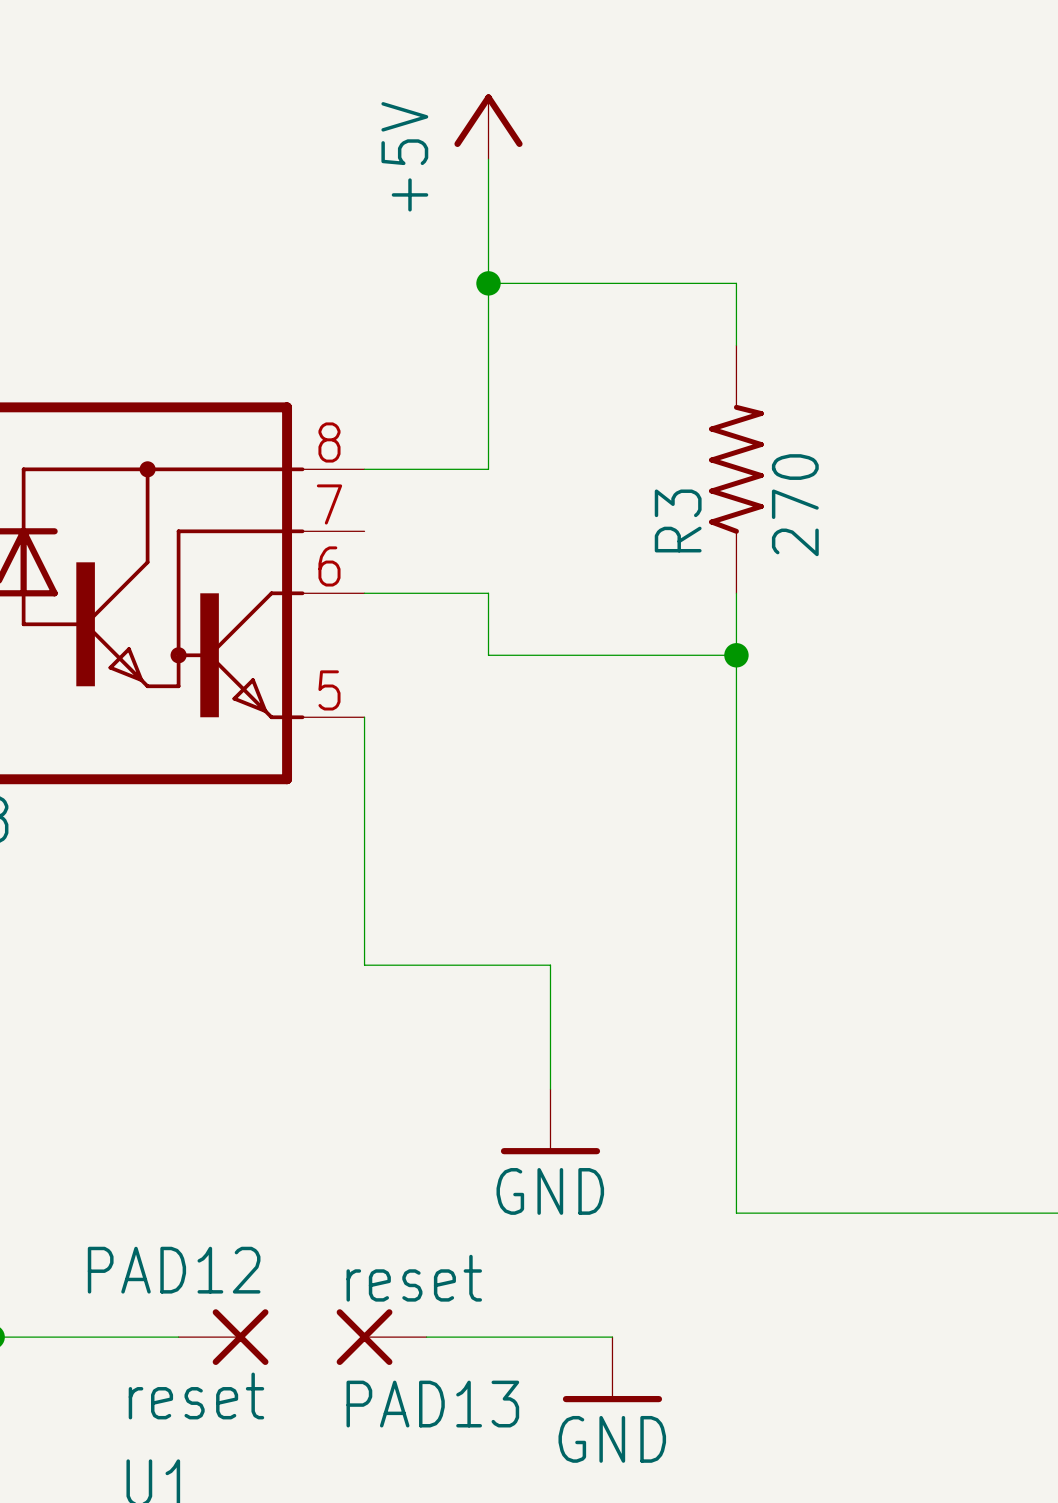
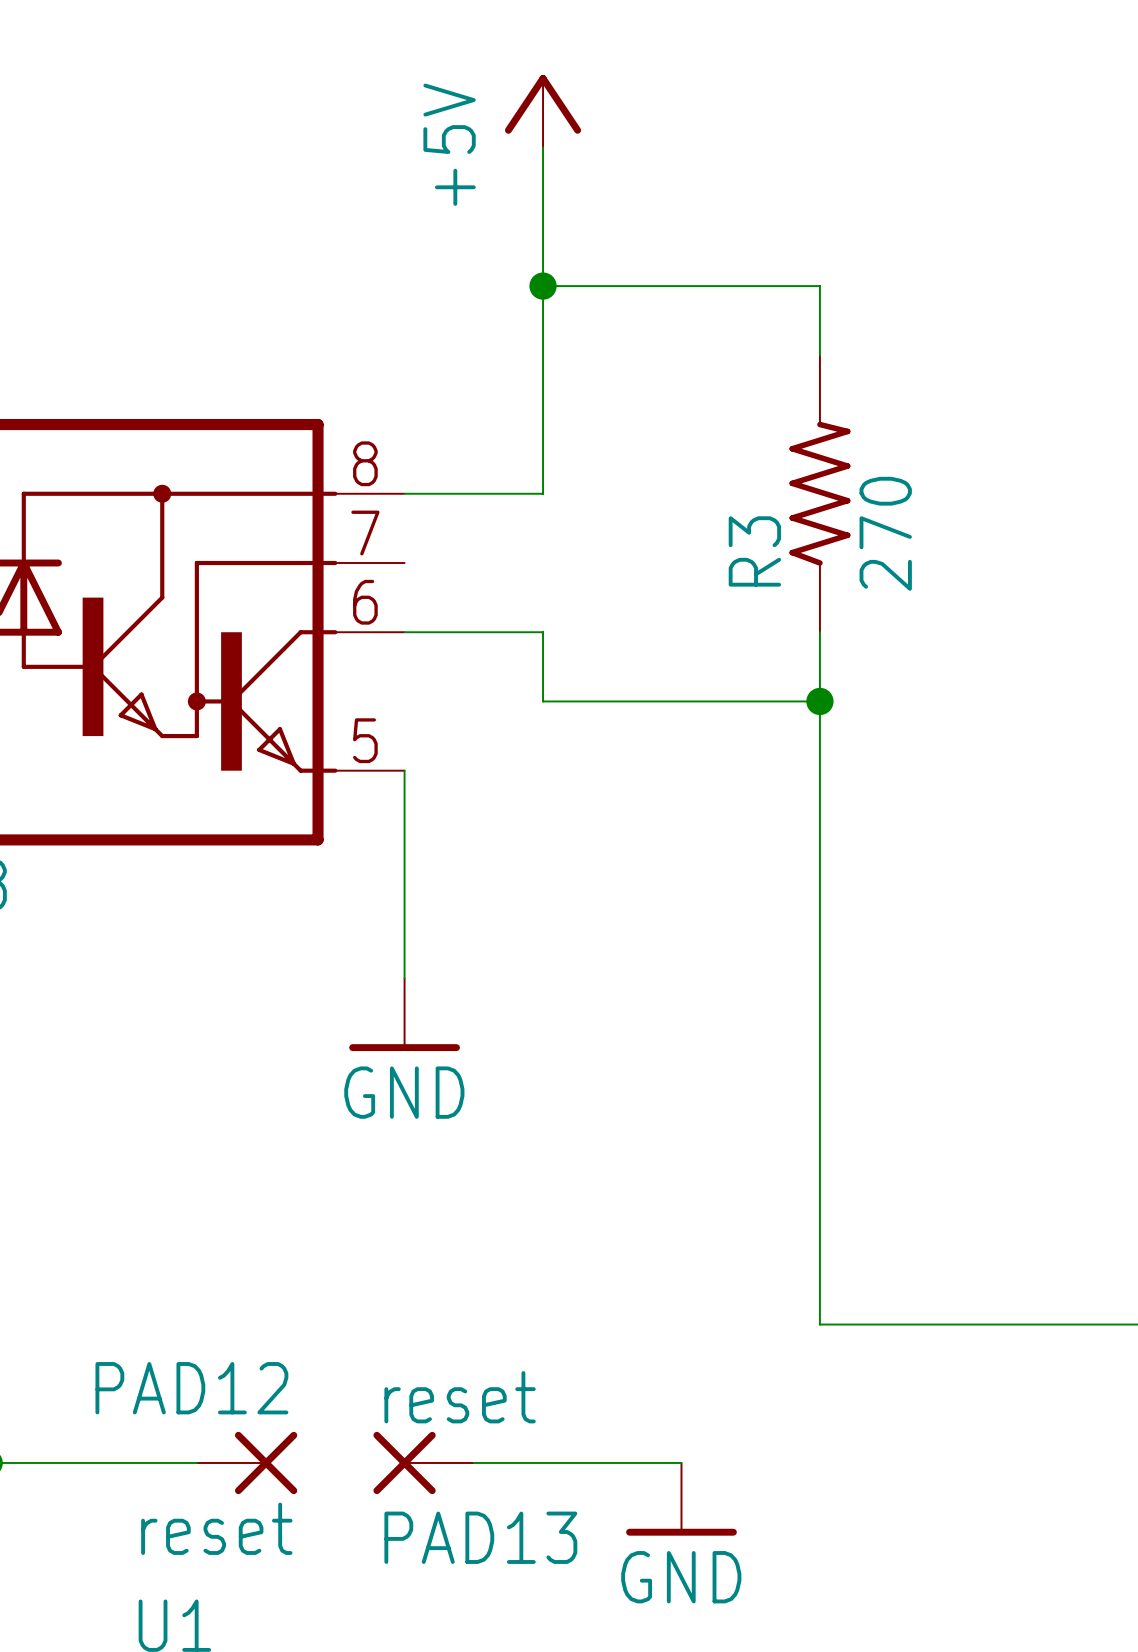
wire: (364, 903) (364, 965) (550, 965) (550, 1089) -> none
power symbol position: GND (550, 1121) -> GND (404, 1014)

